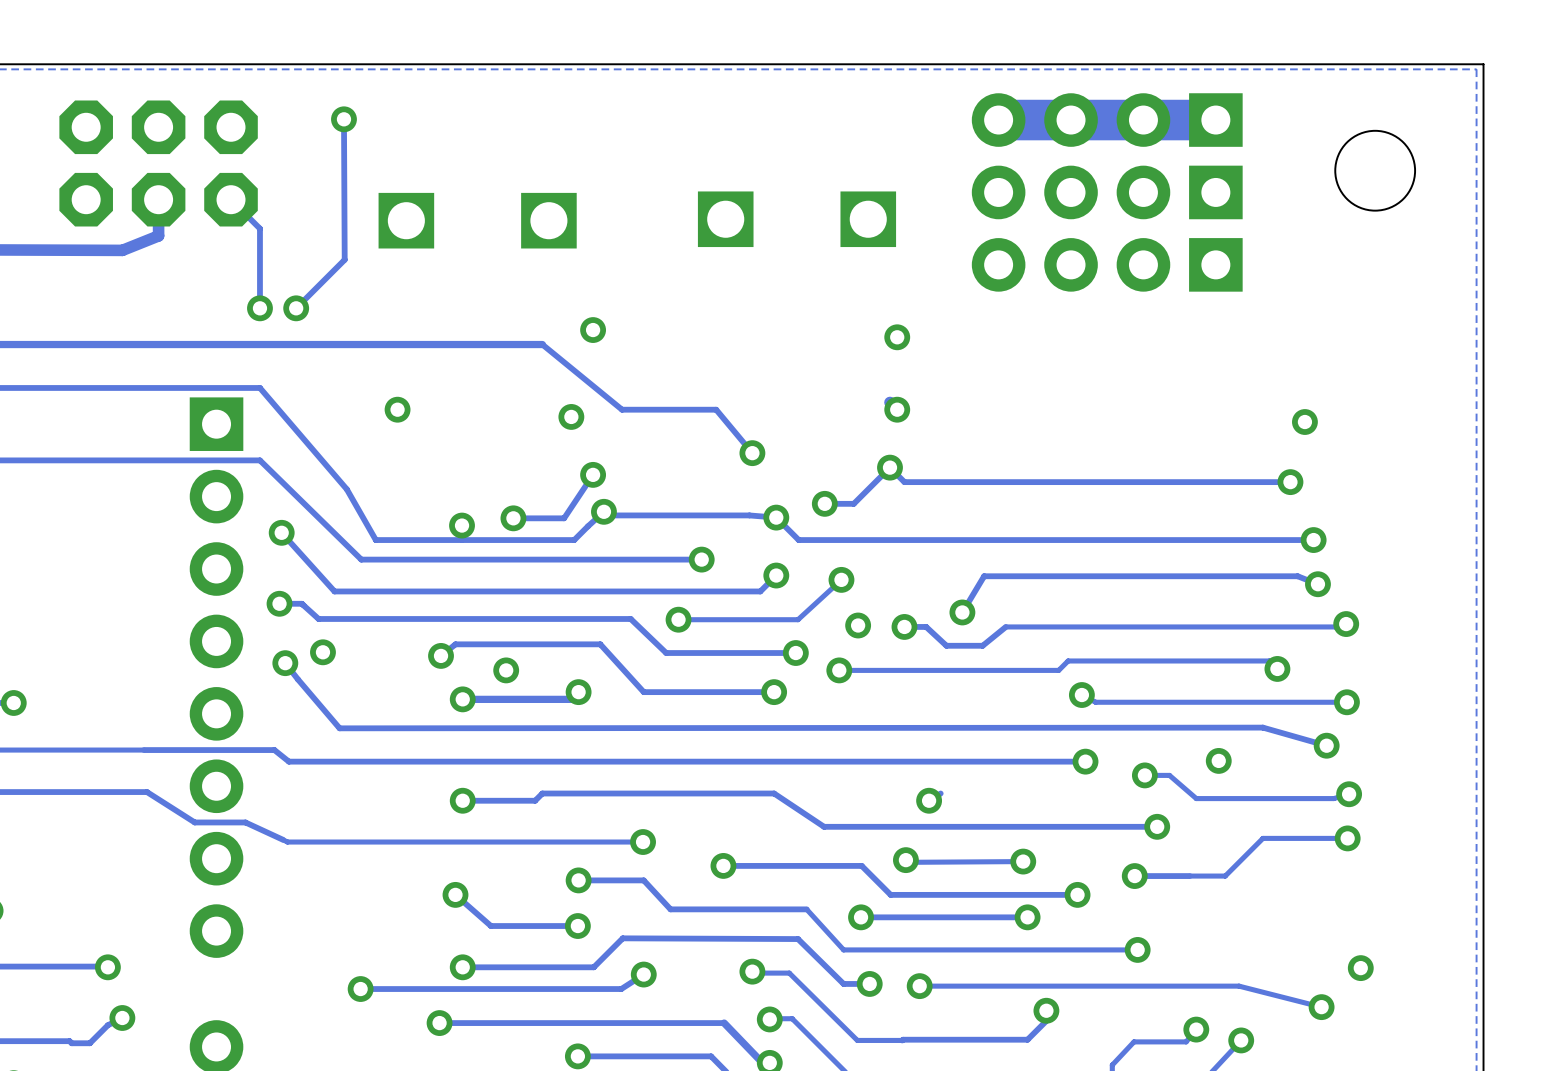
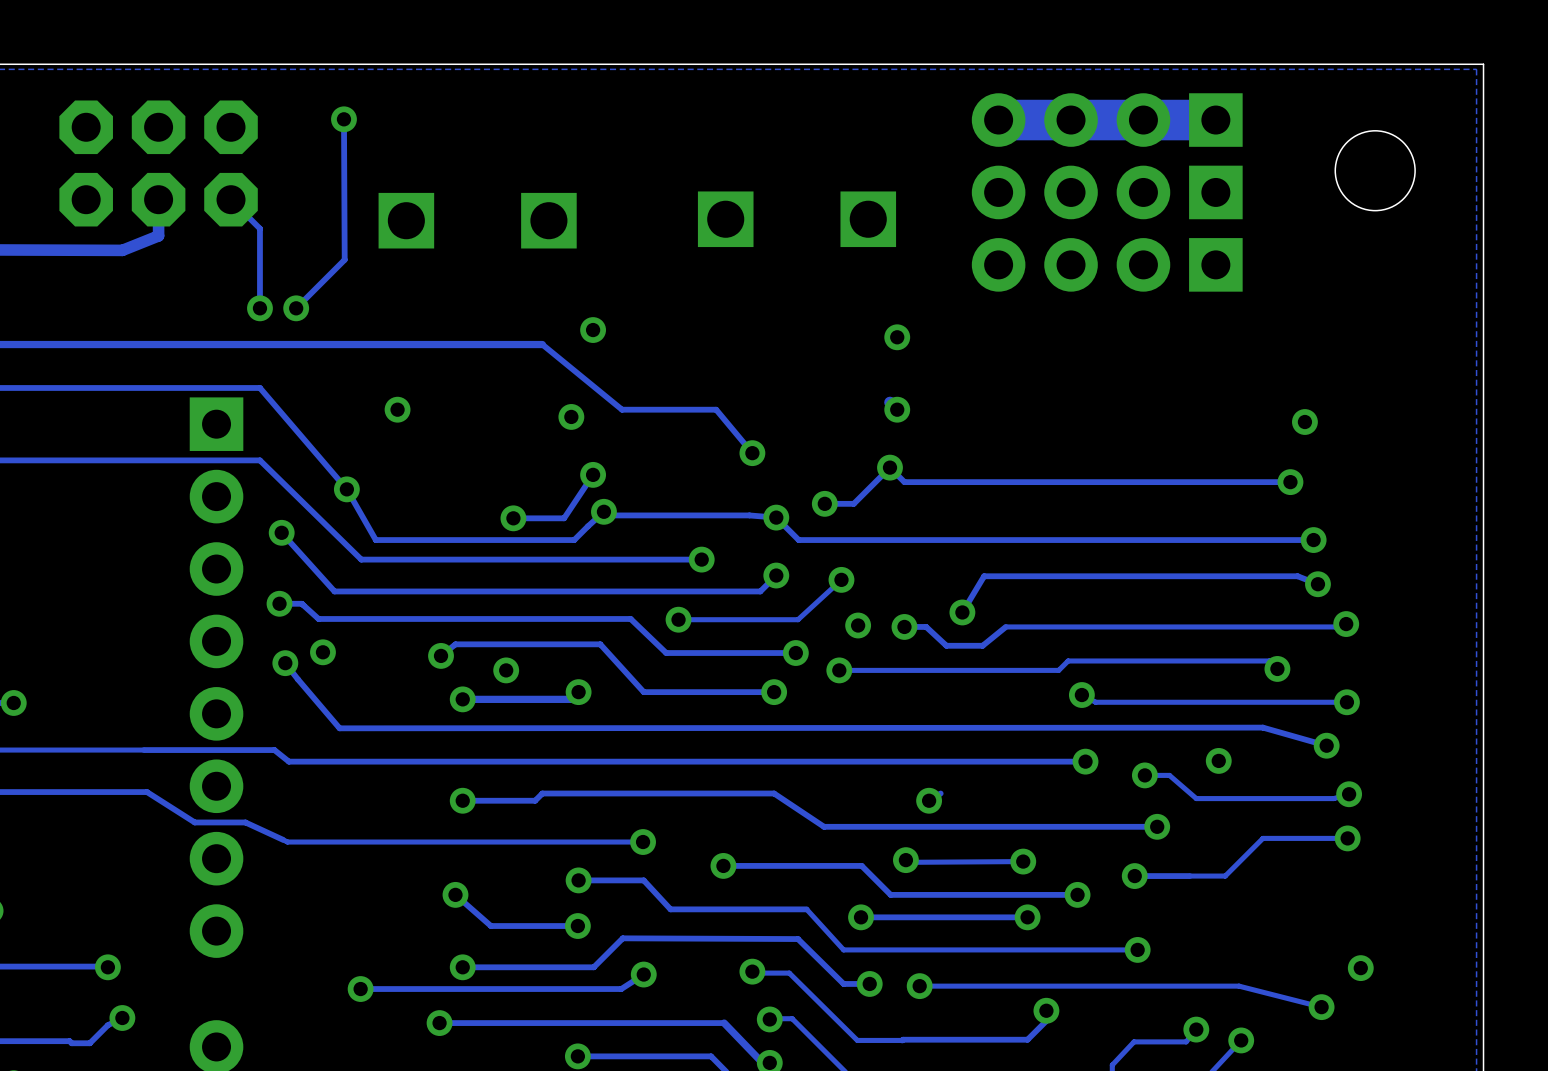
via position: (462, 525) -> (346, 489)

